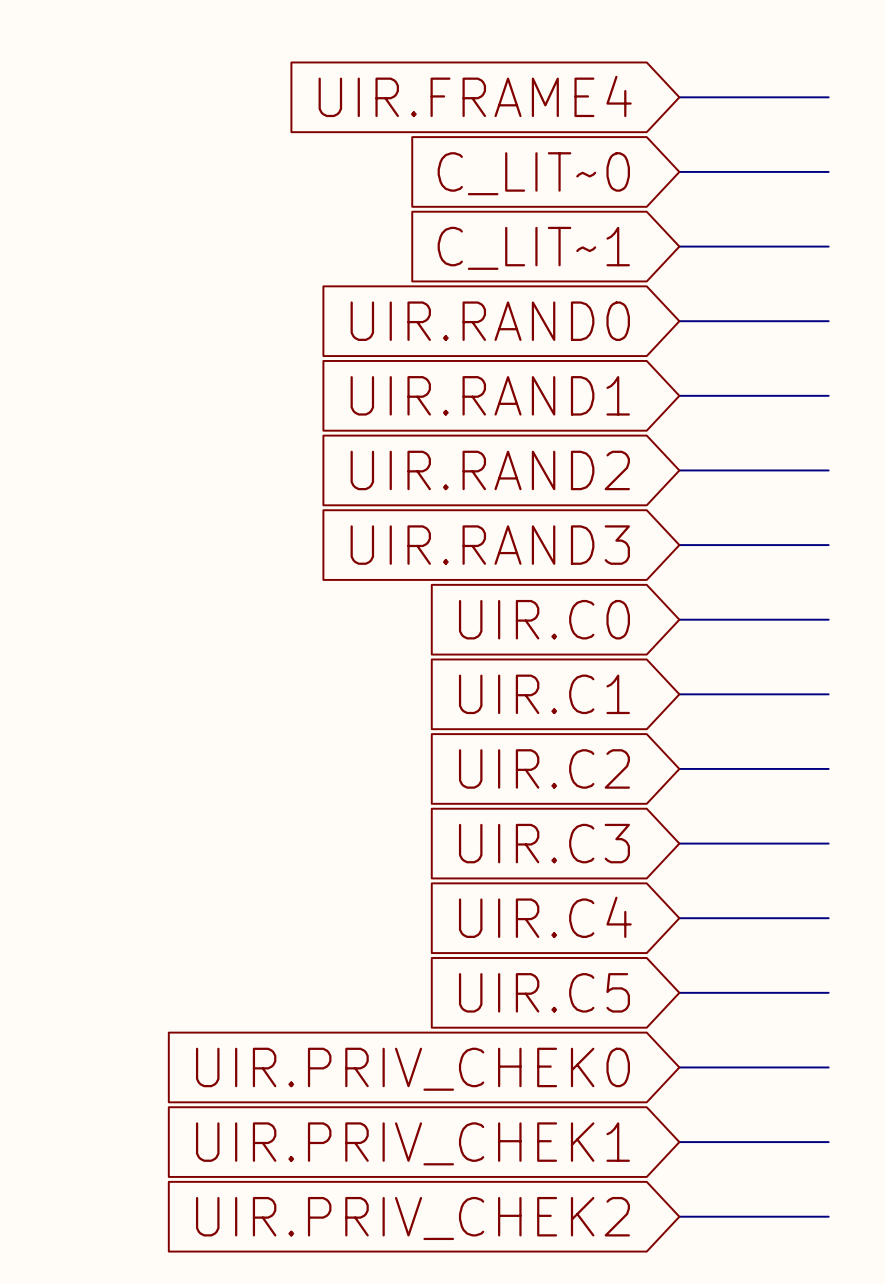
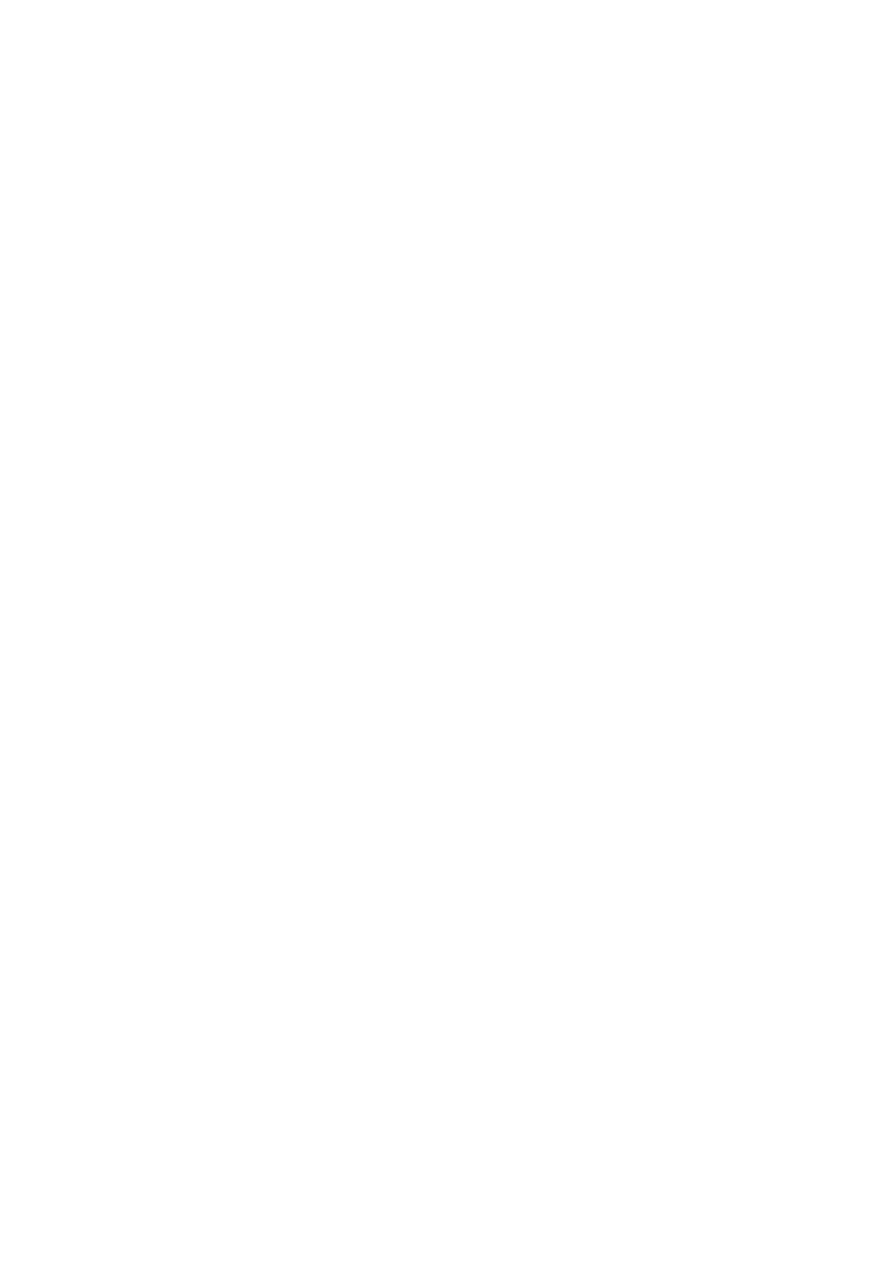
global label: UIR.FRAME4 (475, 96) -> none
wire: (679, 97) (828, 97) -> none
wire: (679, 171) (828, 171) -> none
global label: C_LIT~0 (533, 173) -> none
wire: (679, 246) (828, 246) -> none
global label: C_LIT~1 (533, 248) -> none
global label: UIR.RAND0 (490, 321) -> none
wire: (679, 321) (828, 321) -> none
global label: UIR.RAND1 (490, 395) -> none
wire: (679, 395) (828, 395) -> none
global label: UIR.RAND2 (490, 470) -> none
wire: (679, 470) (828, 470) -> none
global label: UIR.RAND3 (490, 545) -> none
wire: (679, 545) (828, 545) -> none
global label: UIR.C0 (544, 619) -> none
wire: (679, 619) (828, 619) -> none
global label: UIR.C1 (544, 694) -> none
wire: (679, 694) (828, 694) -> none
global label: UIR.C2 (544, 768) -> none
wire: (679, 768) (828, 768) -> none
global label: UIR.C3 (544, 843) -> none
wire: (679, 843) (828, 843) -> none
global label: UIR.C4 (545, 917) -> none
wire: (679, 918) (828, 918) -> none
global label: UIR.C5 (544, 992) -> none
wire: (679, 992) (828, 992) -> none
wire: (679, 1067) (828, 1067) -> none
global label: UIR.PRIV_CHEK0 (412, 1069) -> none
wire: (679, 1142) (828, 1142) -> none
global label: UIR.PRIV_CHEK1 (412, 1143) -> none
wire: (679, 1216) (828, 1216) -> none
global label: UIR.PRIV_CHEK2 (412, 1218) -> none

